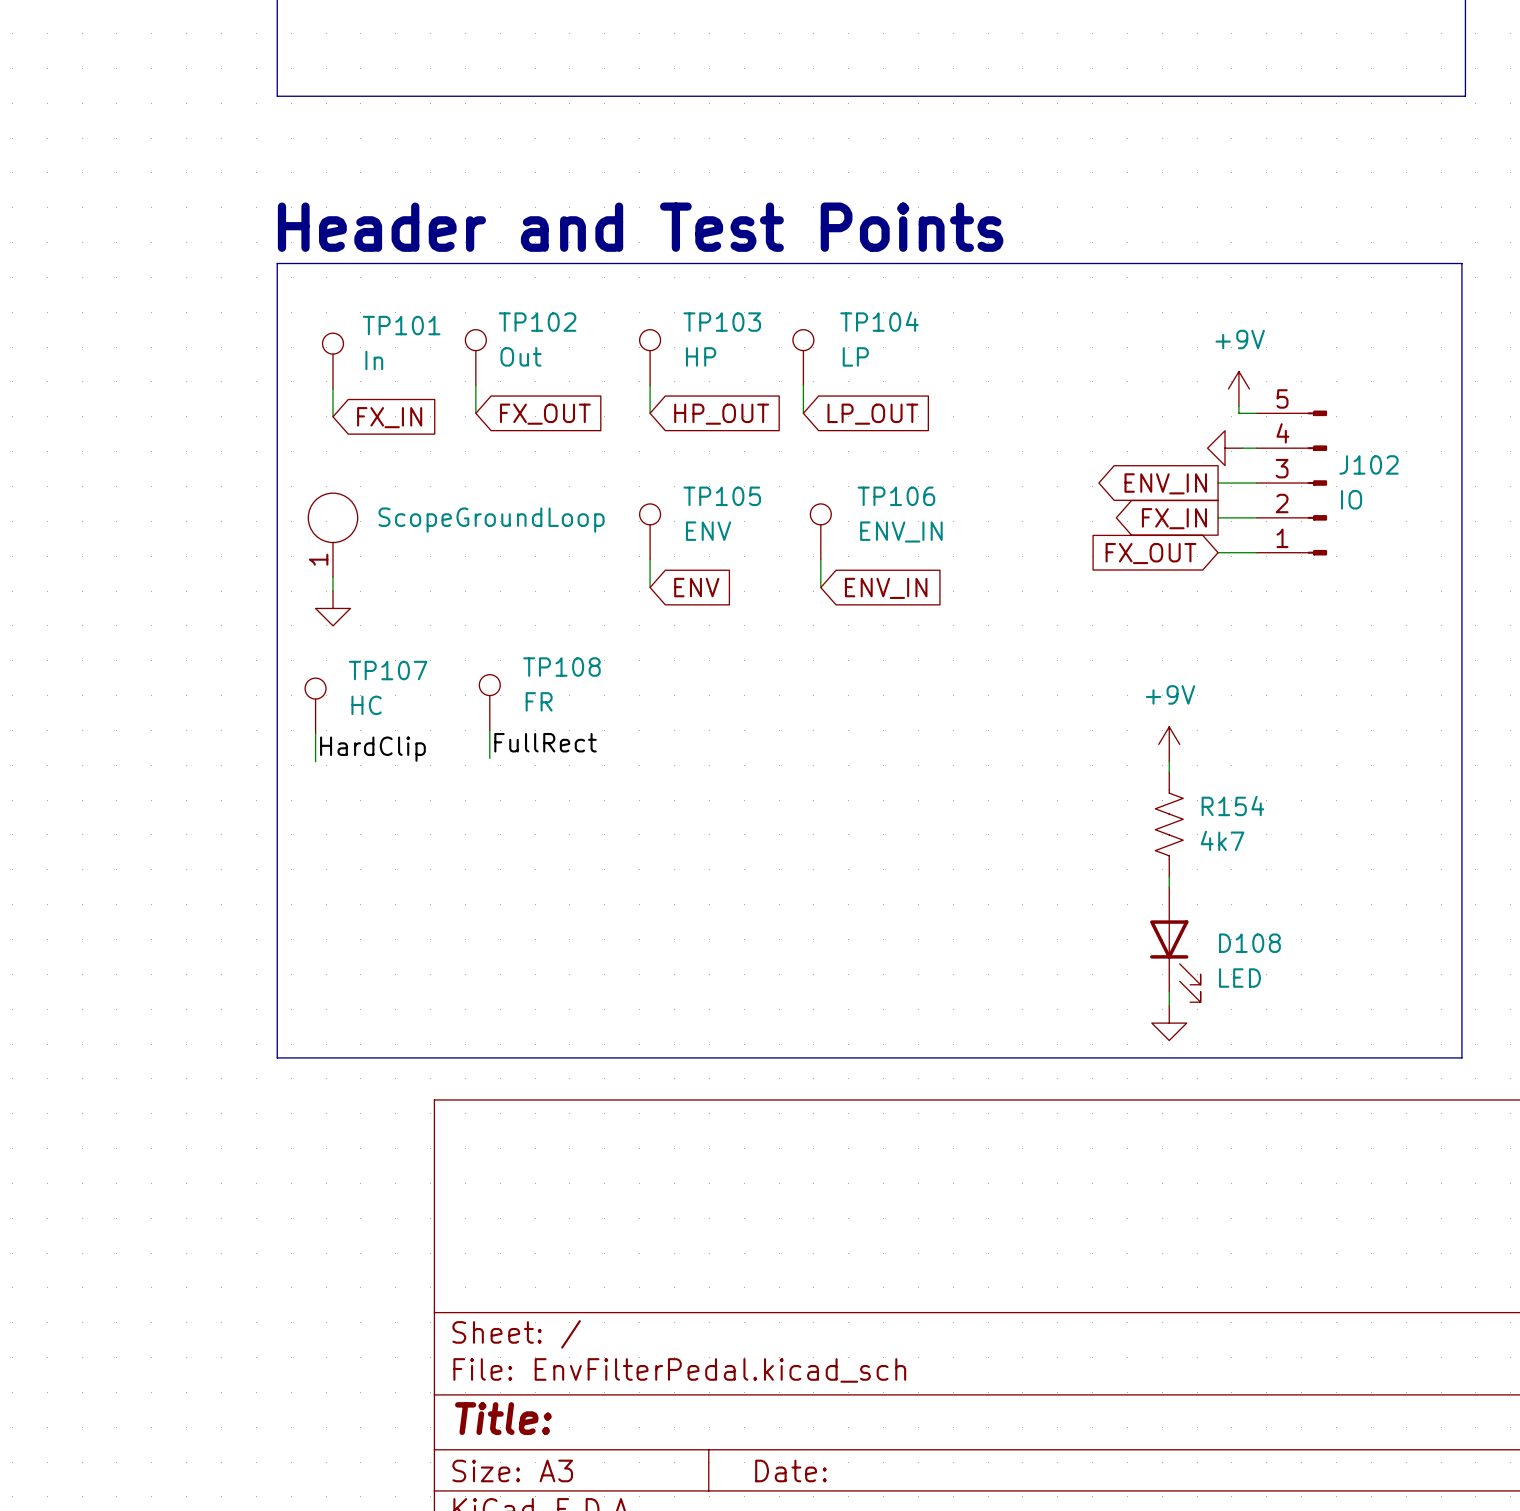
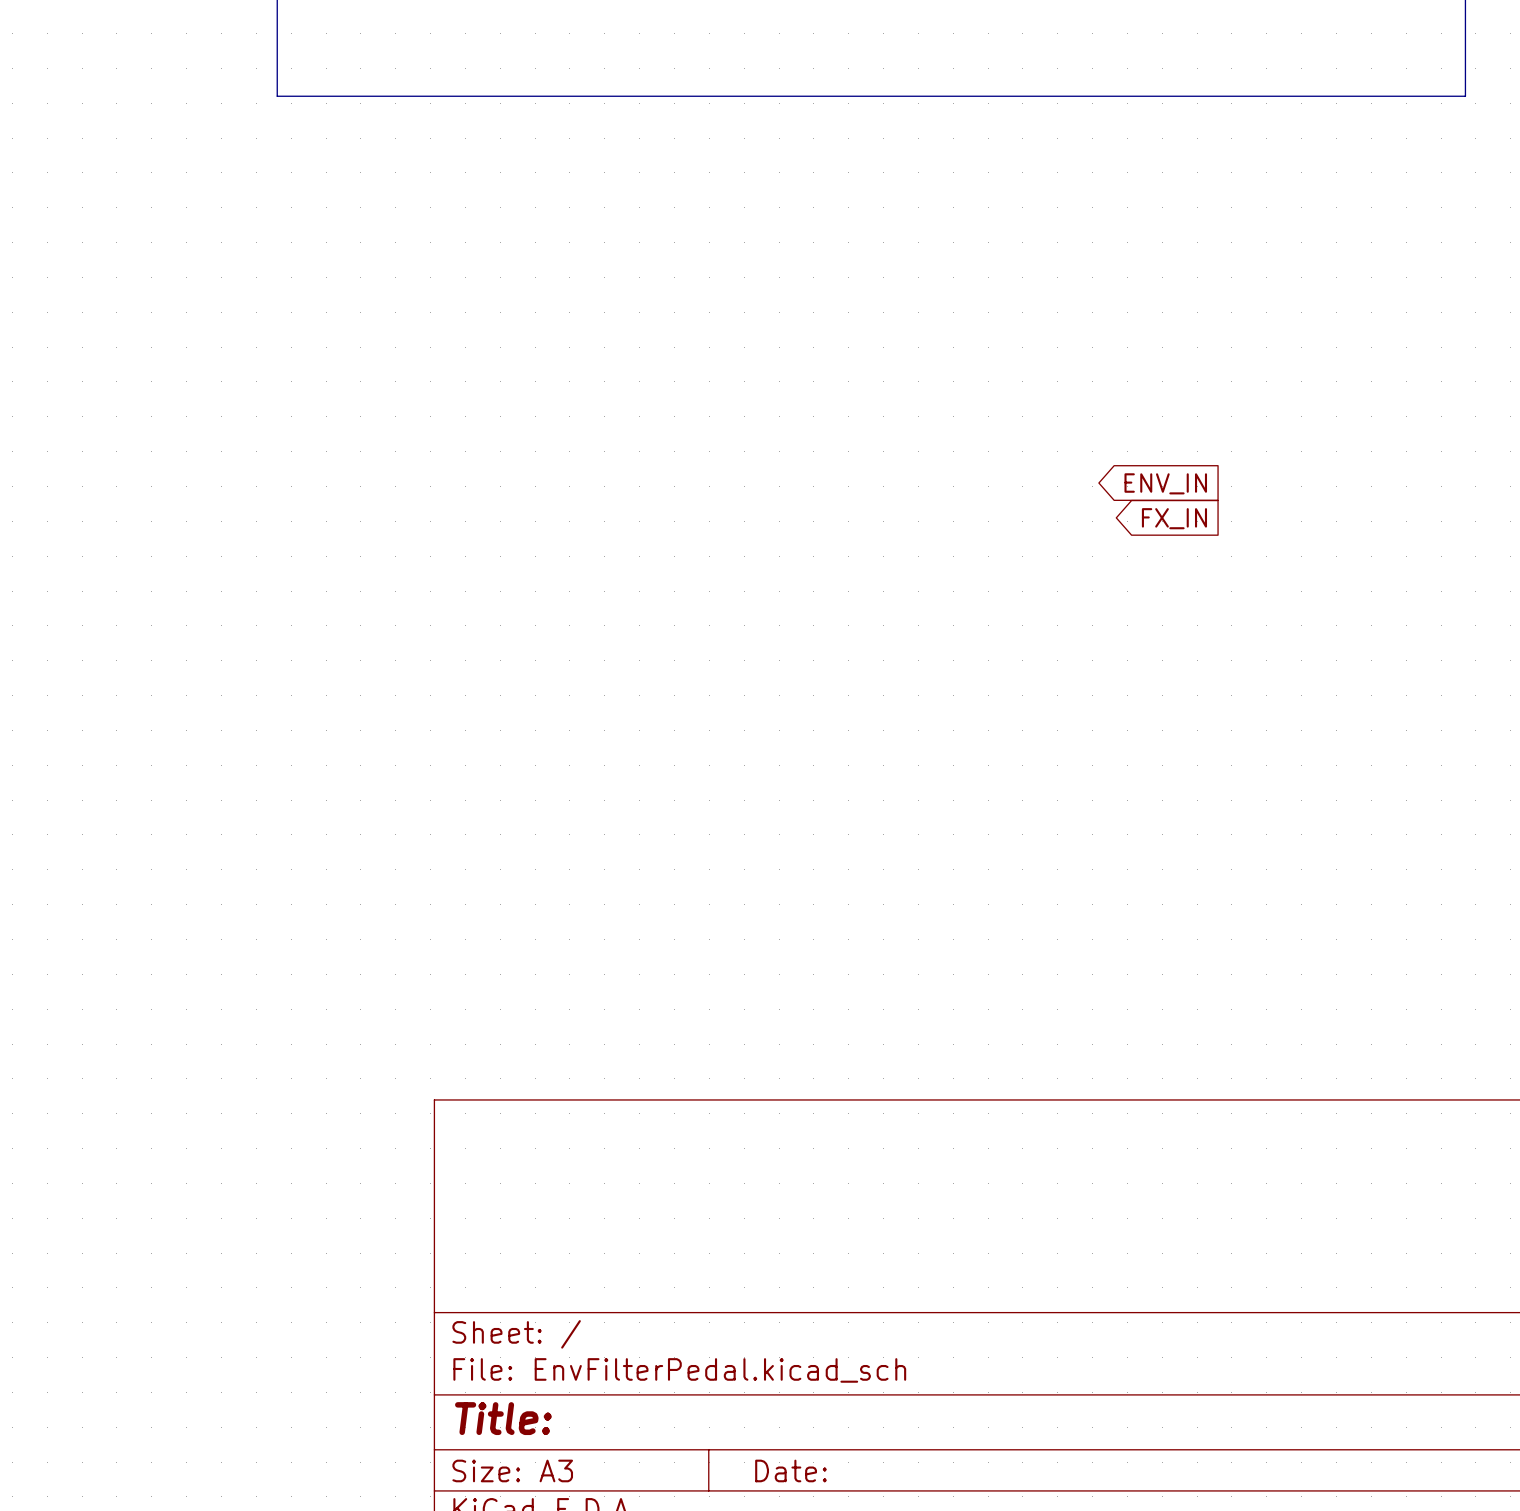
text: Header and Test Points (640, 227) -> none
line: (277, 263) (277, 1057) (1461, 1057) (1461, 263) (277, 263) -> none
TP102: Out (475, 357) -> none
TP103: HP (650, 357) -> none
TP104: LP (803, 357) -> none
TP101: In (333, 361) -> none
wire: (475, 385) (475, 413) -> none
wire: (650, 385) (650, 413) -> none
wire: (803, 385) (803, 413) -> none
wire: (333, 388) (333, 416) -> none
power symbol: +9V (1238, 388) -> none
wire: (1238, 406) (1238, 413) (1256, 413) -> none
global label: FX_OUT (545, 414) -> none
global label: HP_OUT (721, 414) -> none
global label: LP_OUT (872, 414) -> none
global label: FX_IN (389, 417) -> none
power symbol: (1225, 448) -> none
wire: (1242, 448) (1256, 448) -> none
wire: (1218, 483) (1256, 483) -> none
J102: IO (1291, 483) -> none
wire: (1218, 517) (1256, 517) -> none
TP105: ENV (650, 531) -> none
TP106: ENV_IN (820, 531) -> none
part: ScopeGroundLoop (333, 535) -> none
wire: (1218, 552) (1256, 552) -> none
global label: FX_OUT (1151, 553) -> none
wire: (650, 559) (650, 587) -> none
wire: (820, 559) (820, 587) -> none
wire: (333, 577) (333, 591) -> none
global label: ENV (696, 587) -> none
global label: ENV_IN (886, 588) -> none
power symbol: (333, 608) -> none
TP108: FR (489, 702) -> none
TP107: HC (315, 706) -> none
wire: (489, 730) (489, 758) -> none
wire: (315, 733) (315, 761) -> none
label: FullRect (545, 742) -> none
power symbol: +9V (1169, 744) -> none
label: HardClip (372, 749) -> none
wire: (1169, 761) (1169, 772) -> none
R154: 4k7 (1169, 824) -> none
wire: (1169, 876) (1169, 887) -> none
D108: LED (1175, 944) -> none
wire: (1169, 991) (1169, 1005) -> none
power symbol: (1169, 1023) -> none

